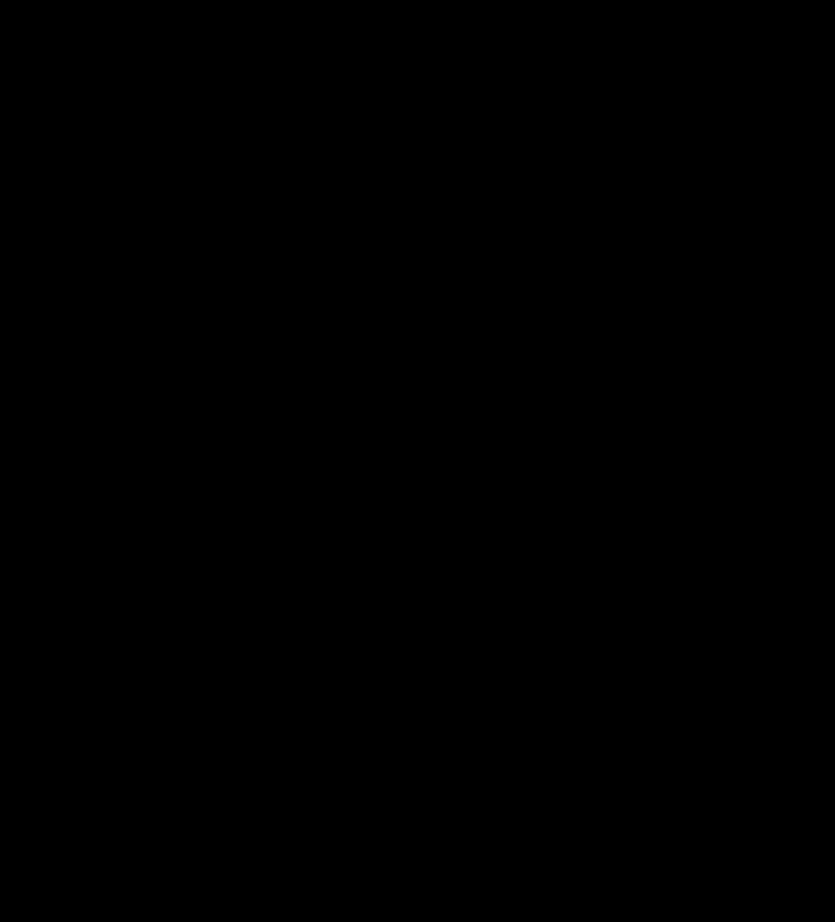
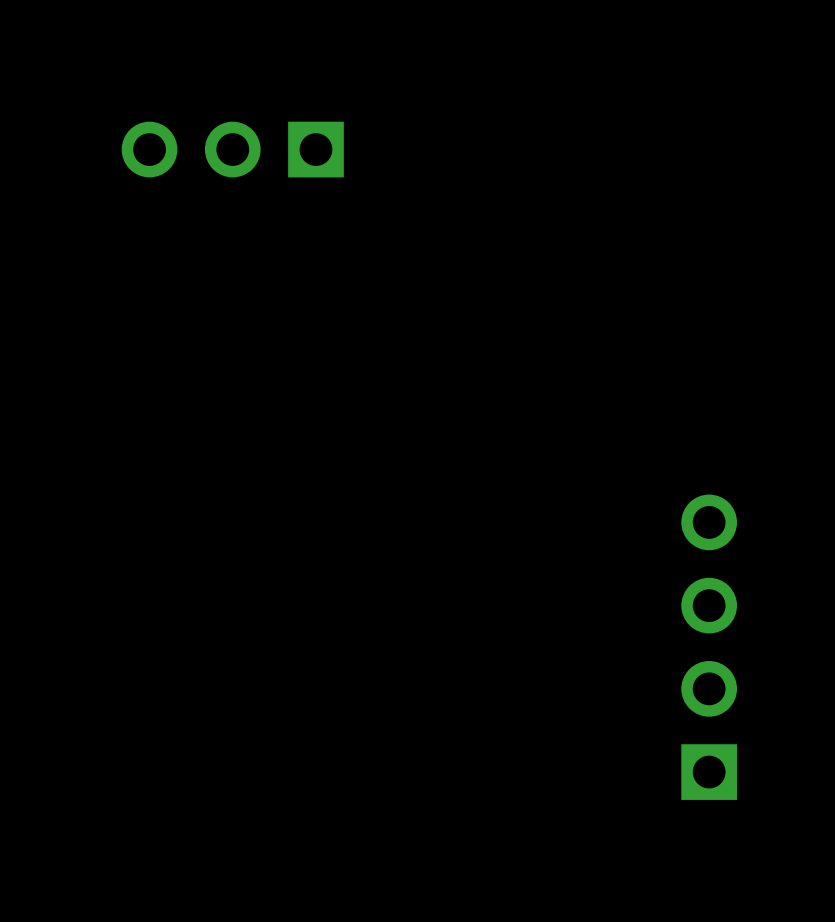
part: none -> (232, 149)
part: none -> (709, 647)

